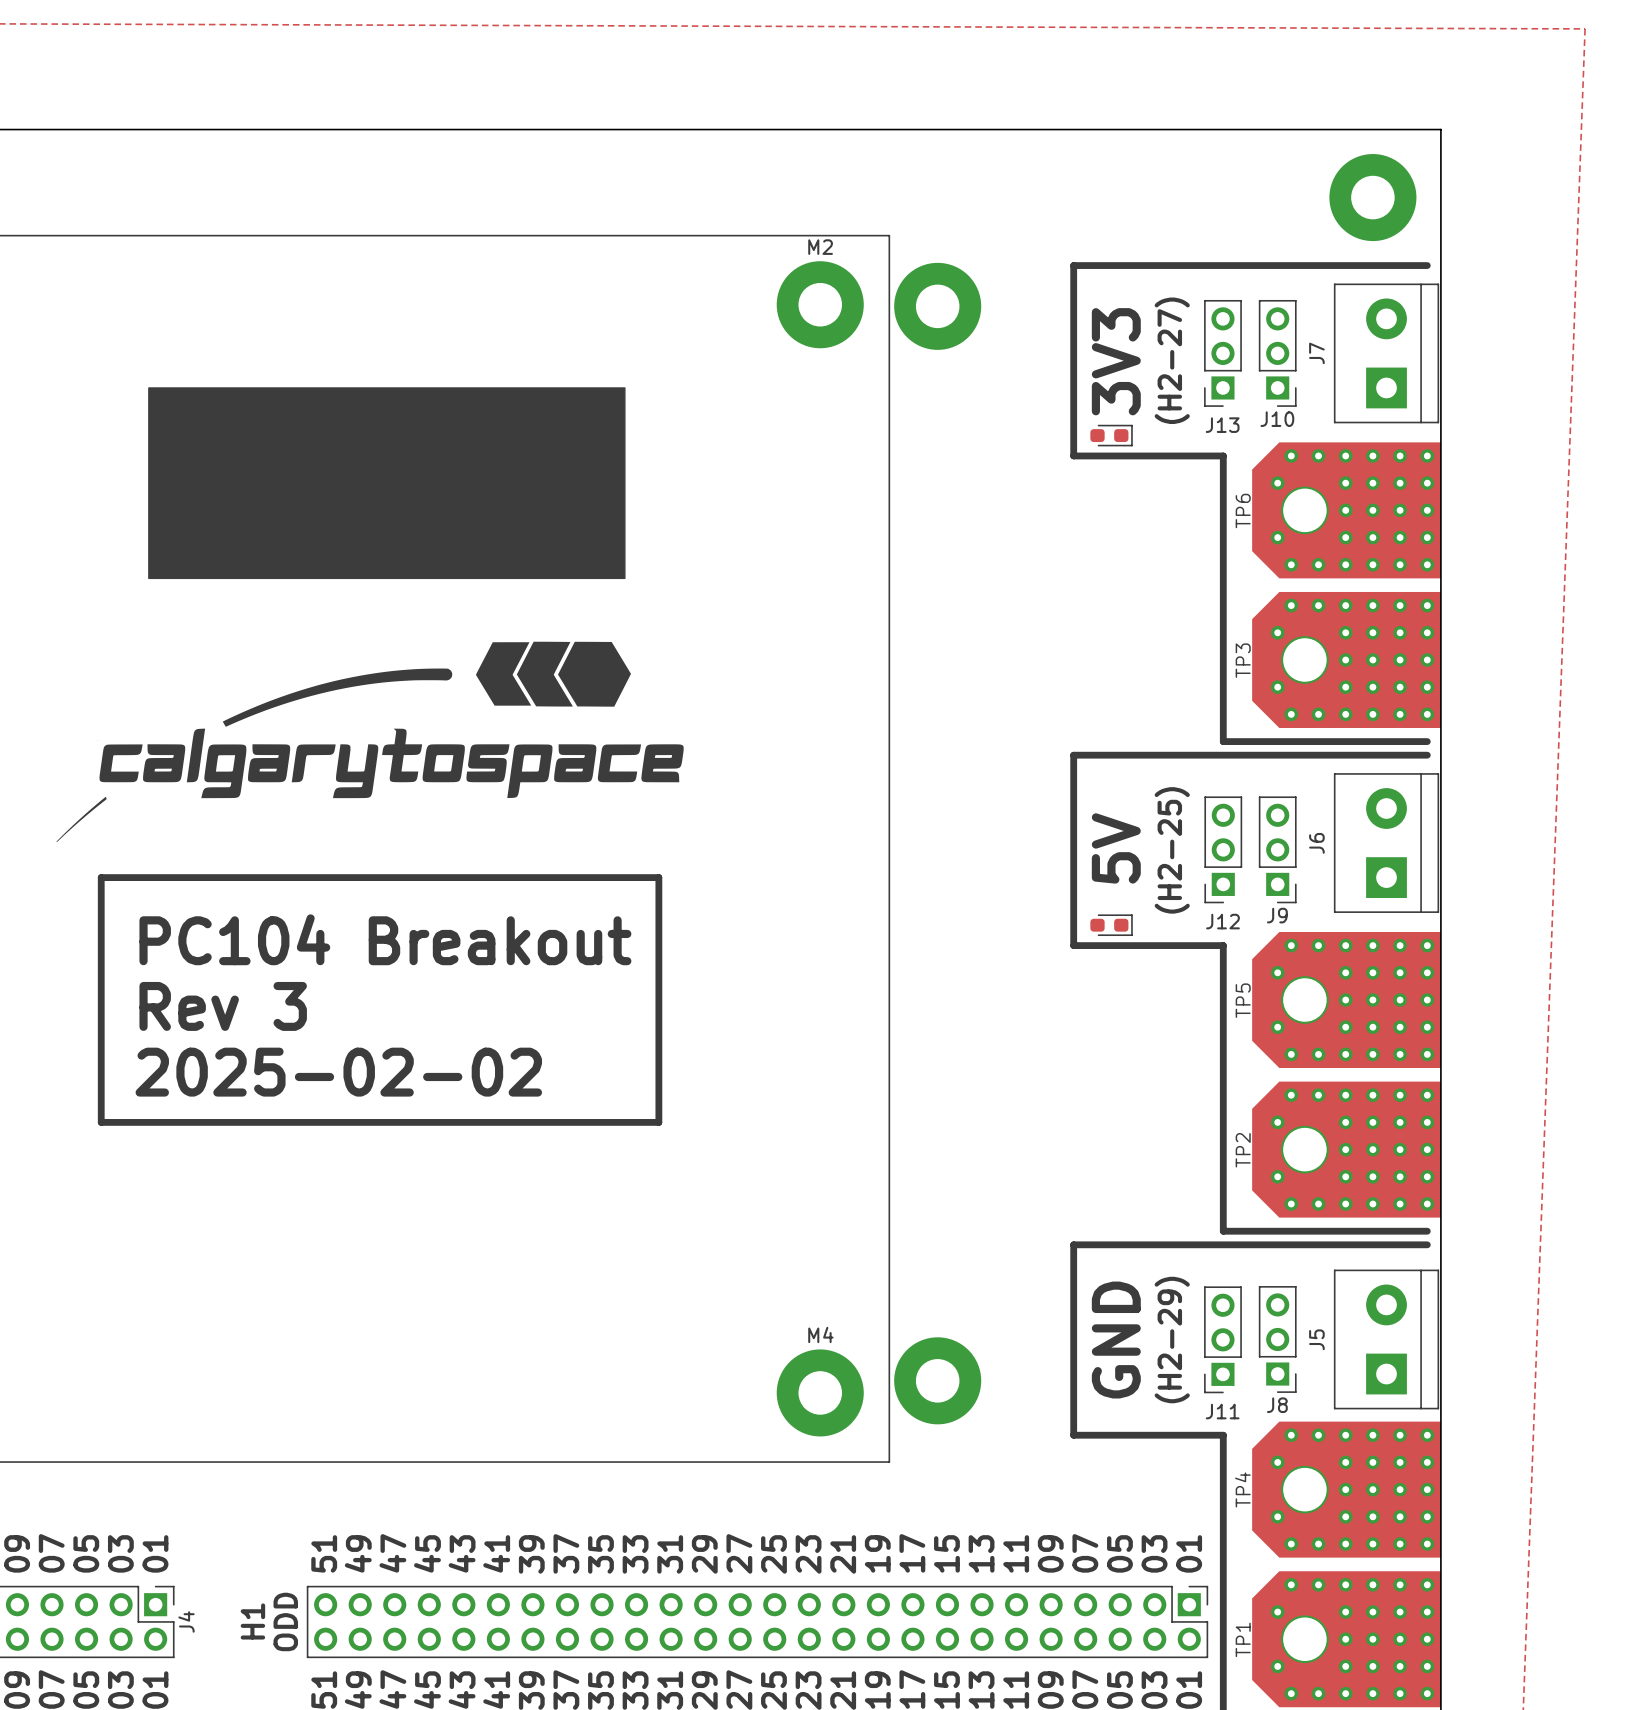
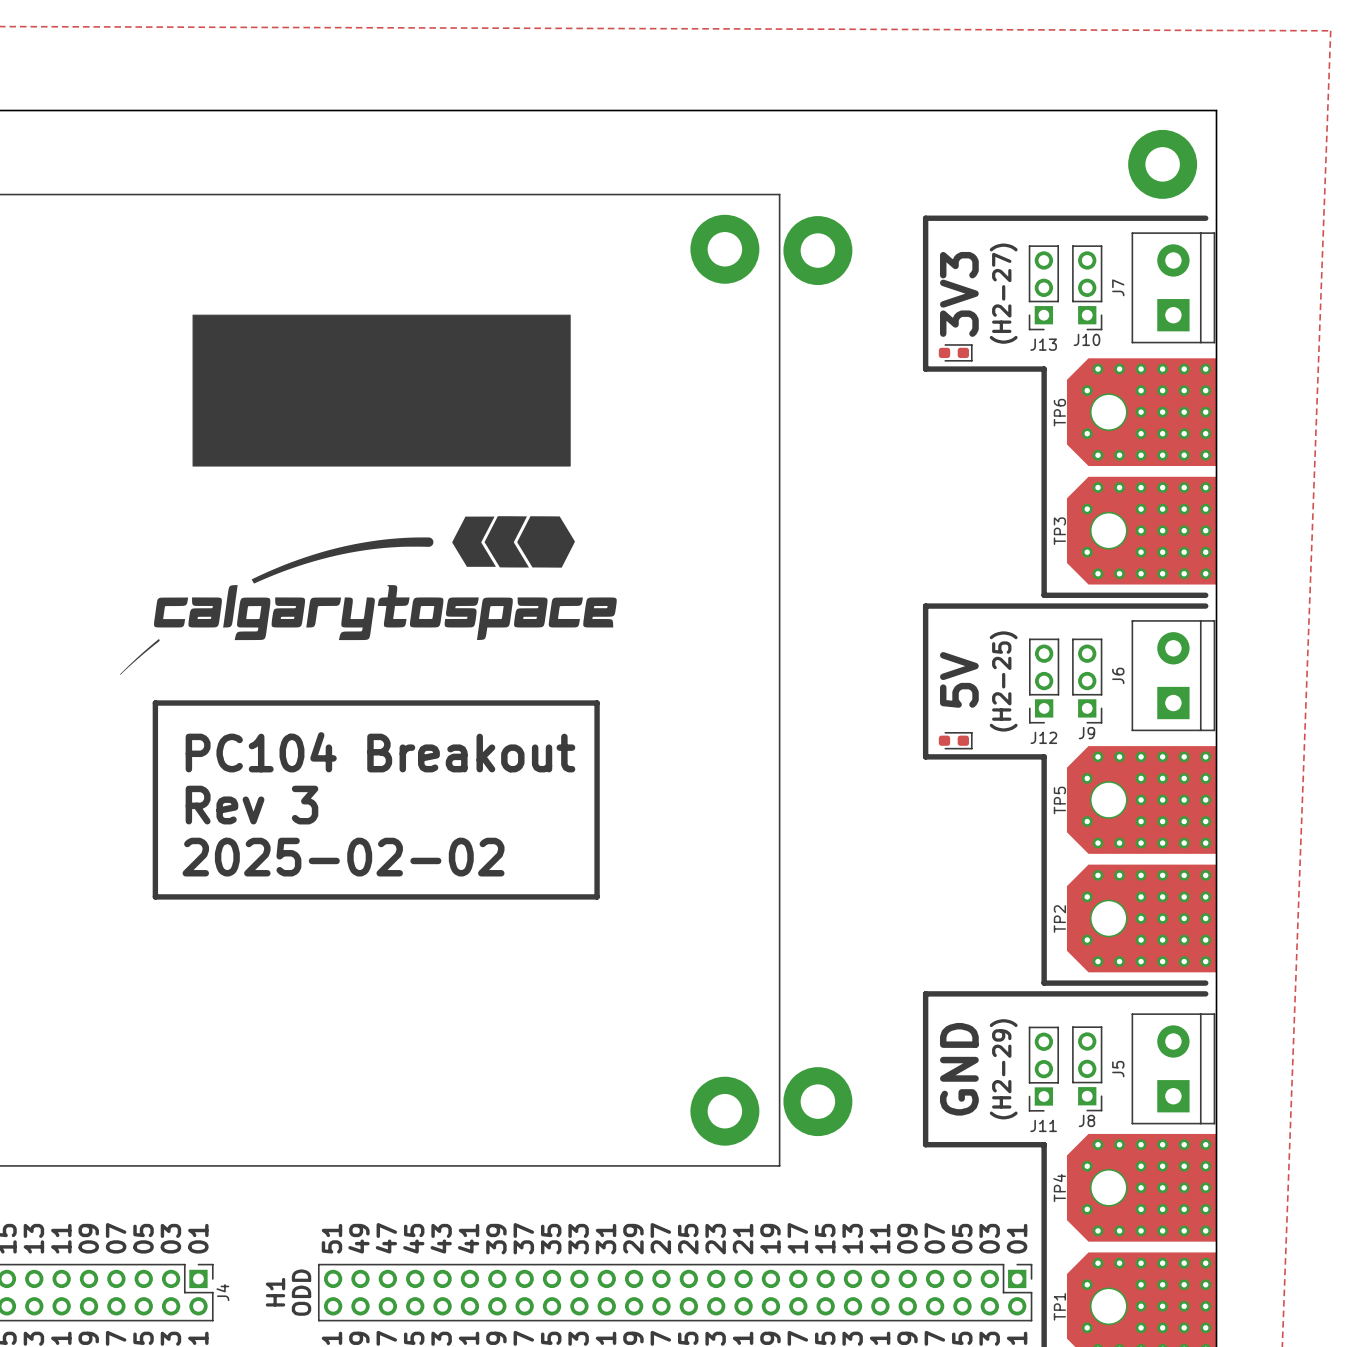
M2 name: M2 (820, 247) -> none
M4 name: M4 (820, 1334) -> none

